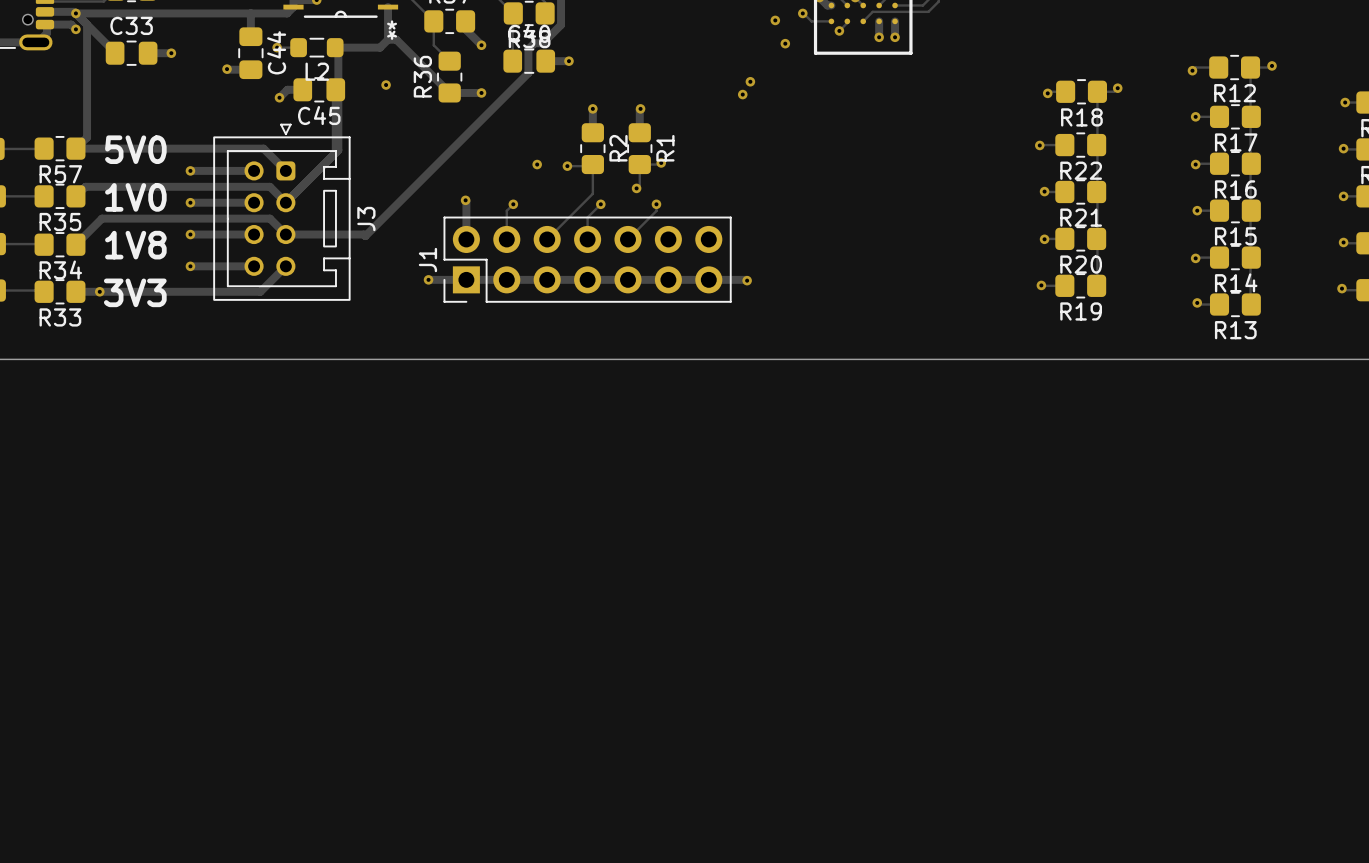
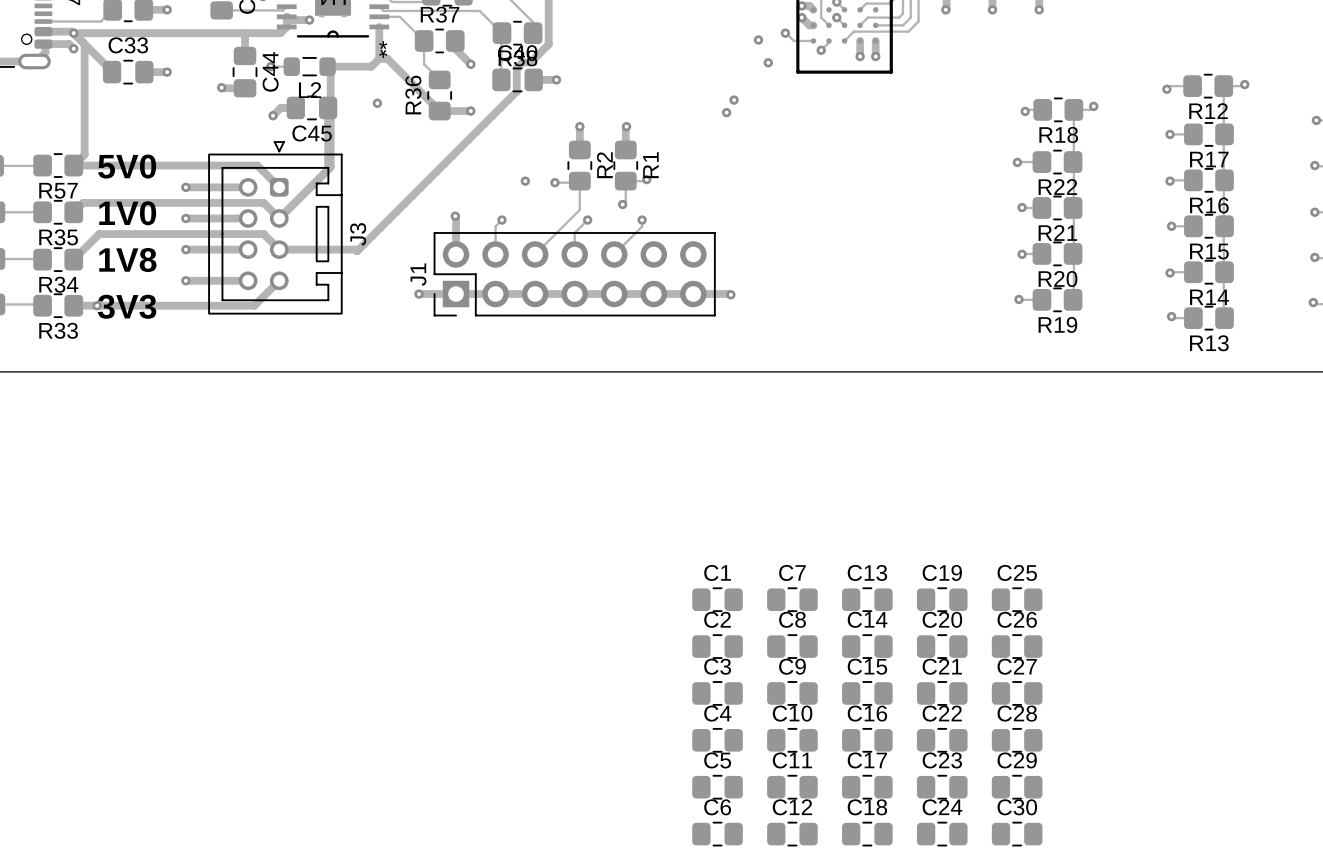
C1: none -> (717, 599)
C7: none -> (792, 599)
C13: none -> (867, 599)
C19: none -> (942, 599)
C25: none -> (1017, 599)
C2: none -> (717, 646)
C8: none -> (792, 646)
C14: none -> (867, 646)
C20: none -> (942, 646)
C26: none -> (1017, 646)
C3: none -> (717, 693)
C9: none -> (792, 693)
C15: none -> (867, 693)
C21: none -> (942, 693)
C27: none -> (1017, 693)
C4: none -> (717, 740)
C10: none -> (792, 740)
C16: none -> (867, 740)
C22: none -> (942, 740)
C28: none -> (1017, 740)
C5: none -> (717, 787)
C11: none -> (792, 787)
C17: none -> (867, 787)
C23: none -> (942, 787)
C29: none -> (1017, 787)
C6: none -> (717, 834)
C12: none -> (792, 834)
C18: none -> (867, 834)
C24: none -> (942, 834)
C30: none -> (1017, 834)

